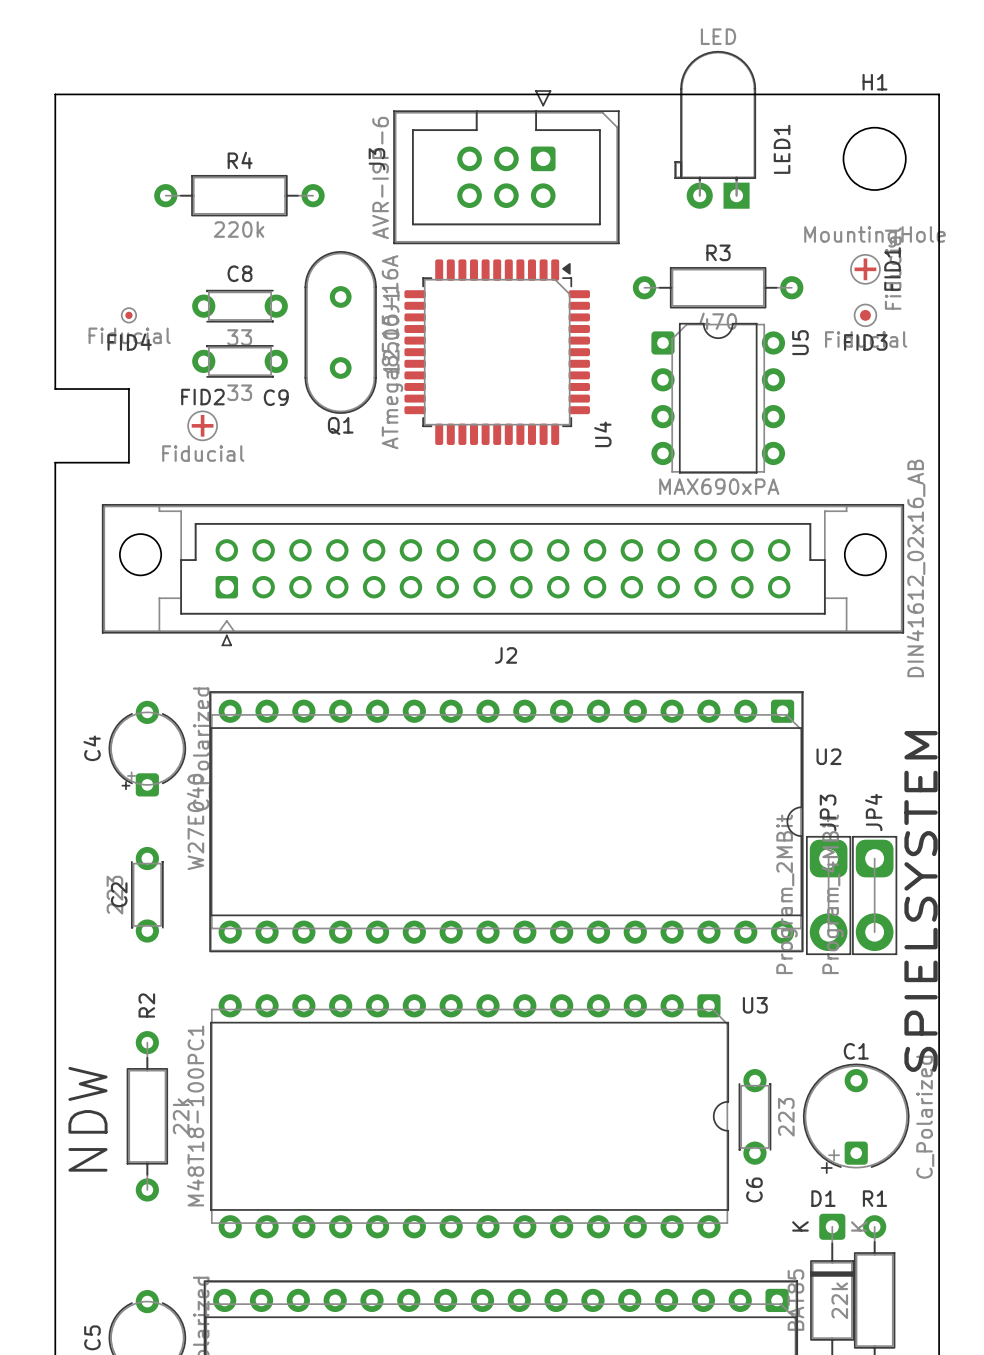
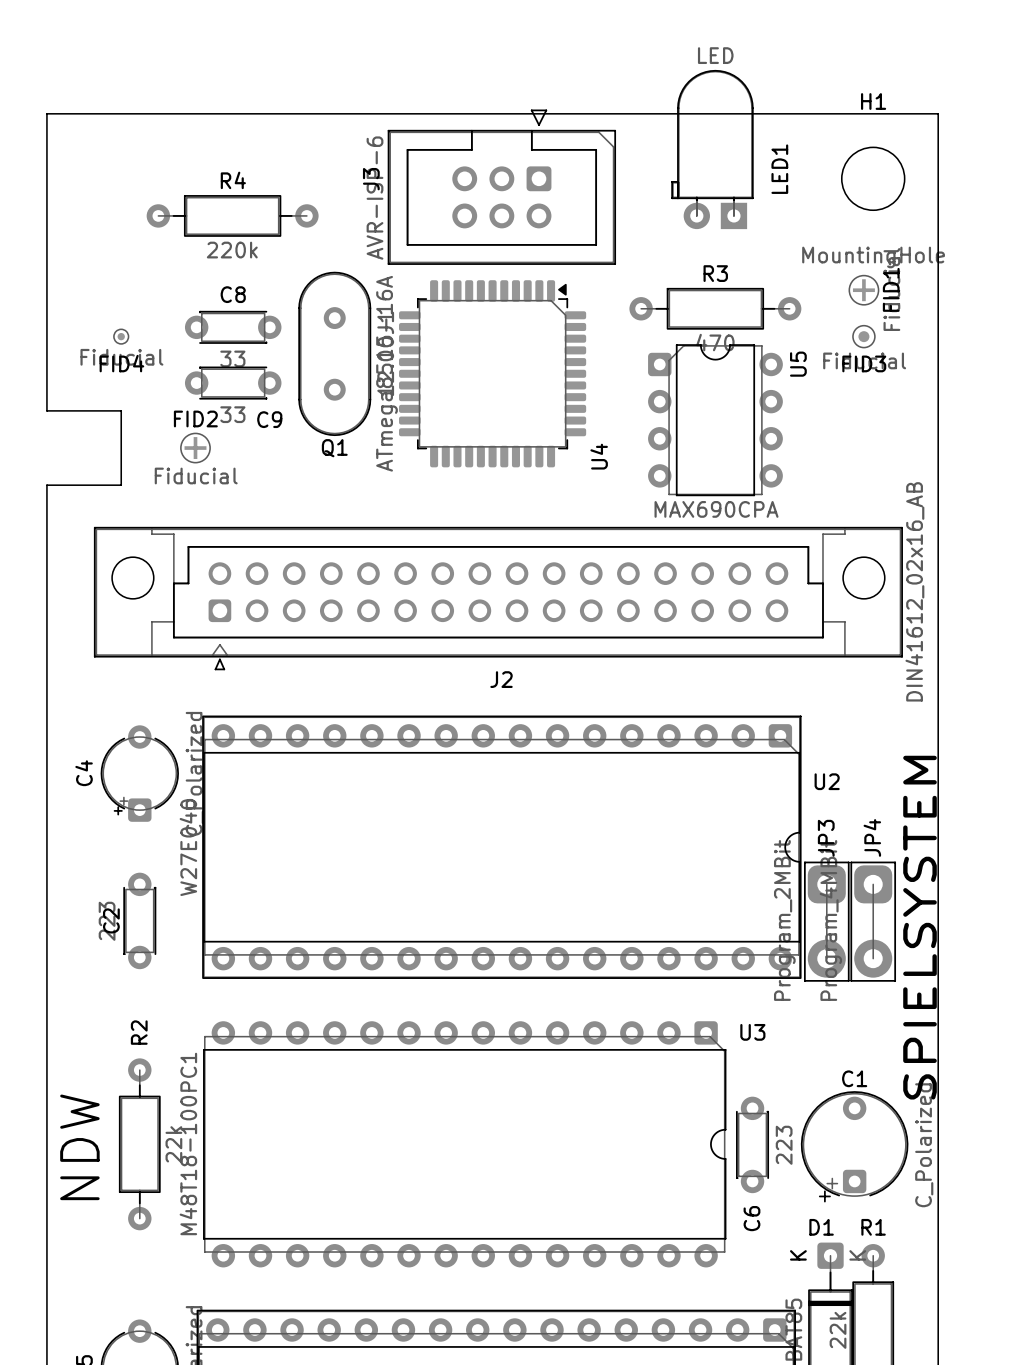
U5 value: MAX690xPA (719, 486) -> MAX690CPA (716, 509)

